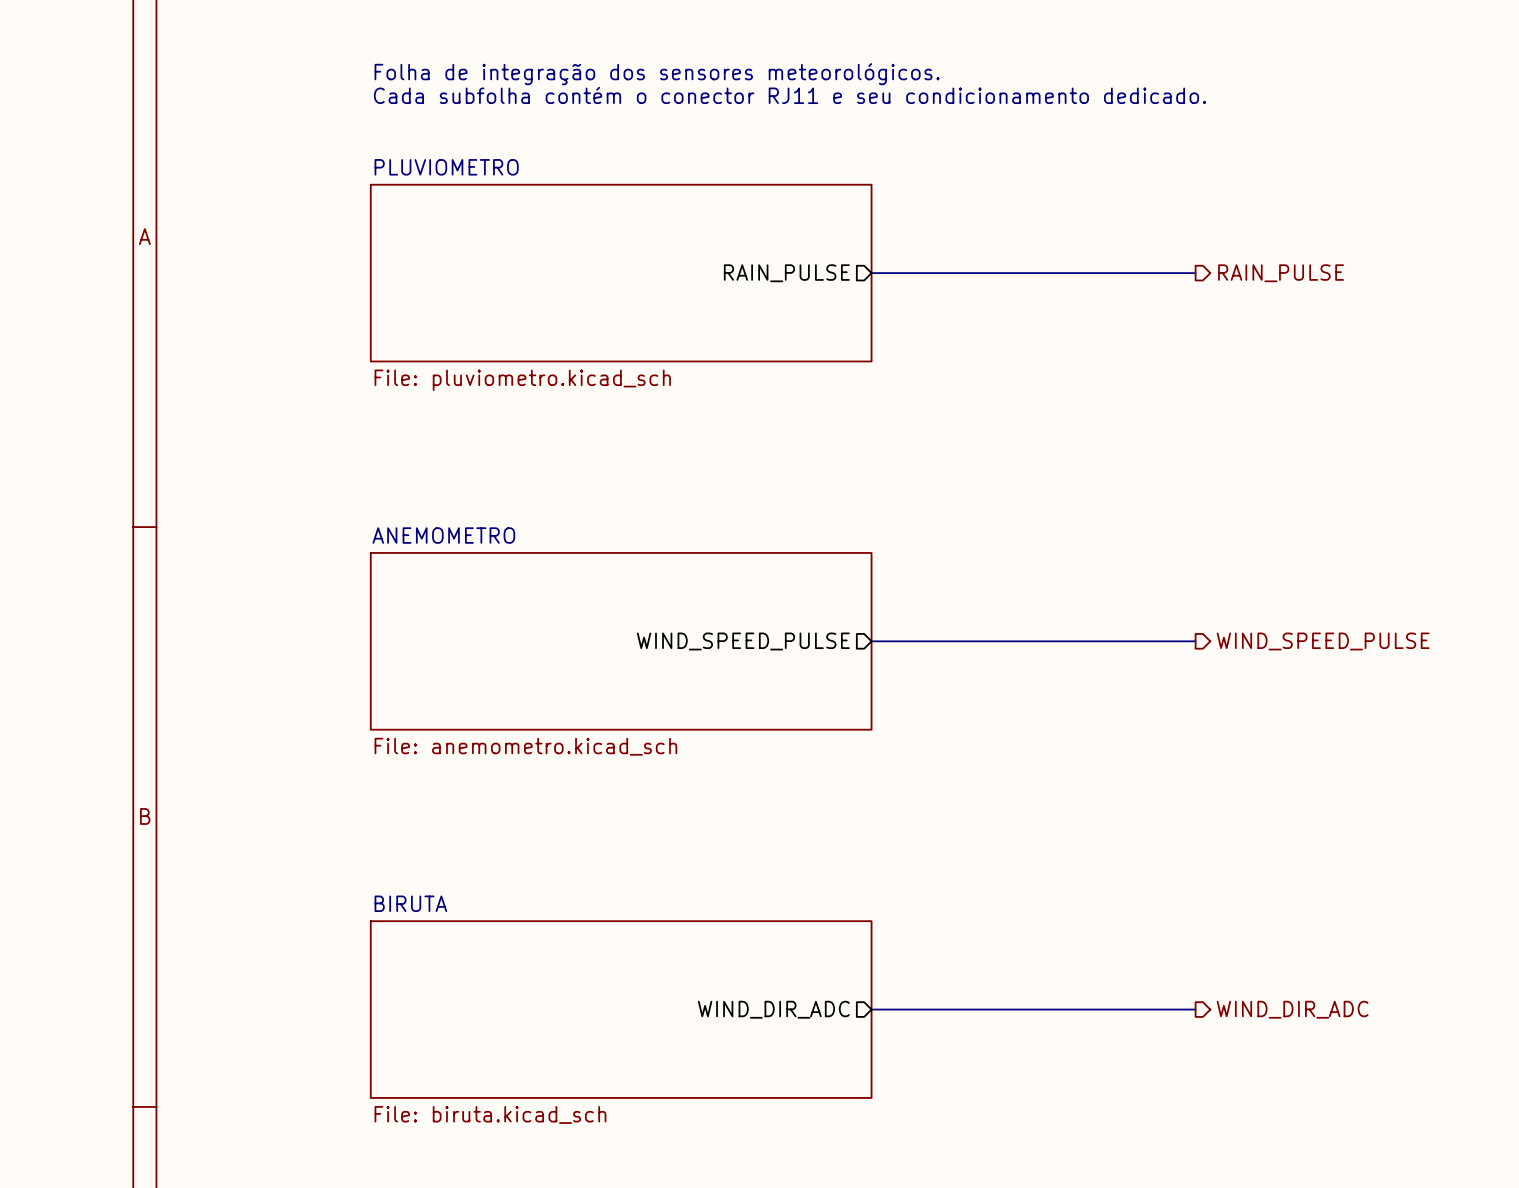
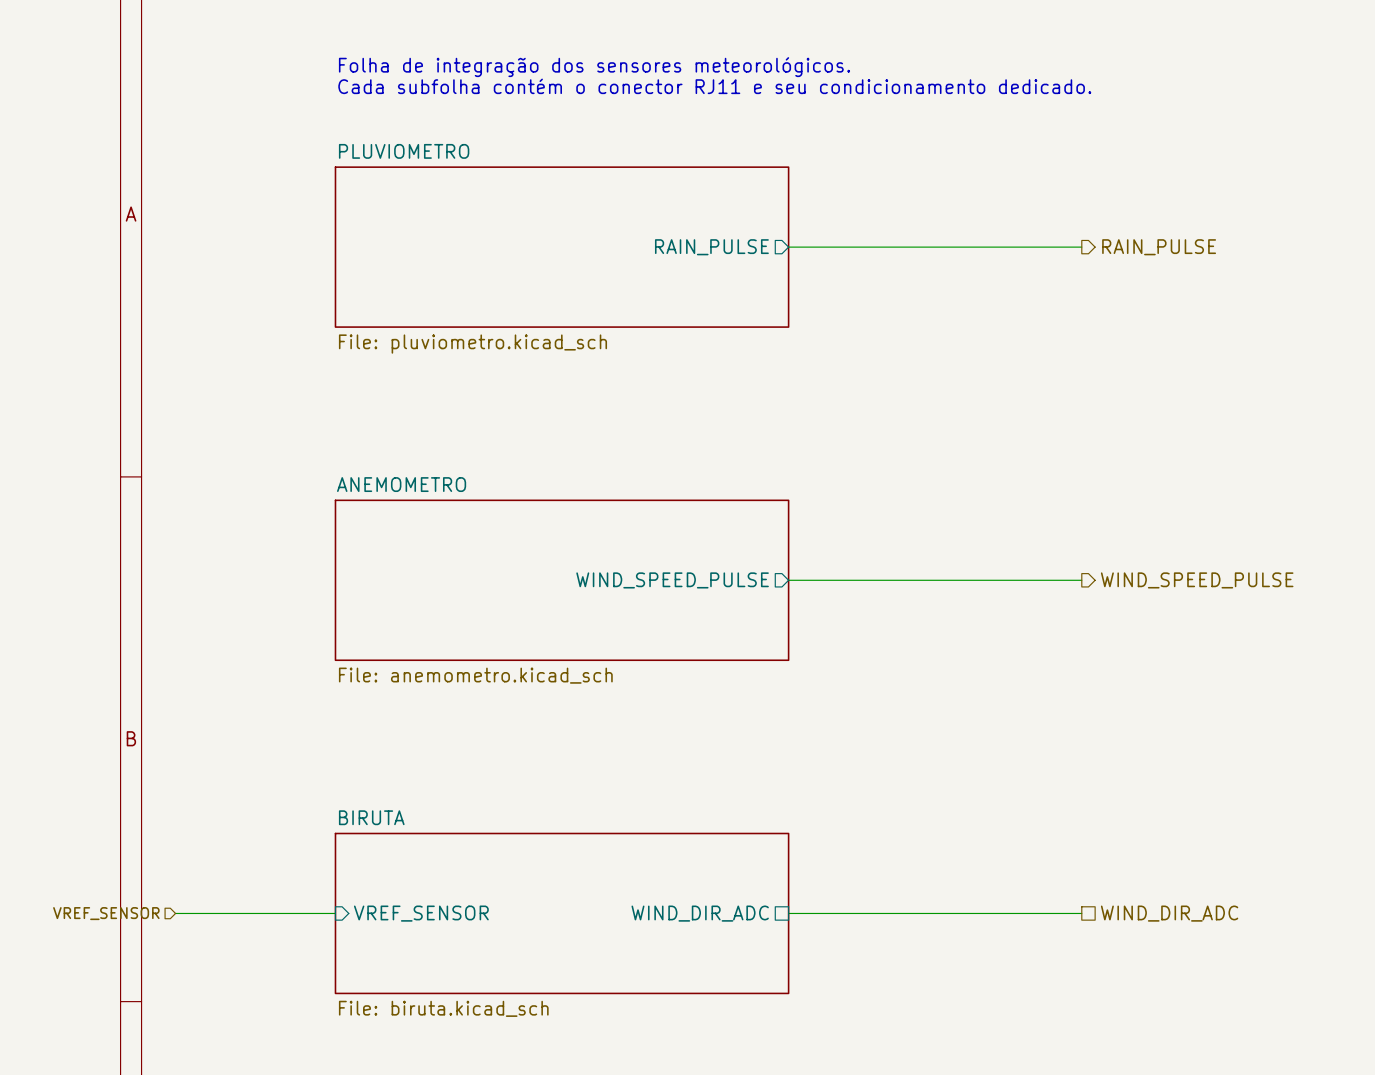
hierarchical label: none -> VREF_SENSOR (106, 913)
wire: none -> (175, 913) (335, 913)
sheet pin: none -> VREF_SENSOR (421, 913)
sheet pin shape: output (773, 1009) -> passive (700, 913)
hierarchical label shape: output (1292, 1009) -> passive (1169, 913)

